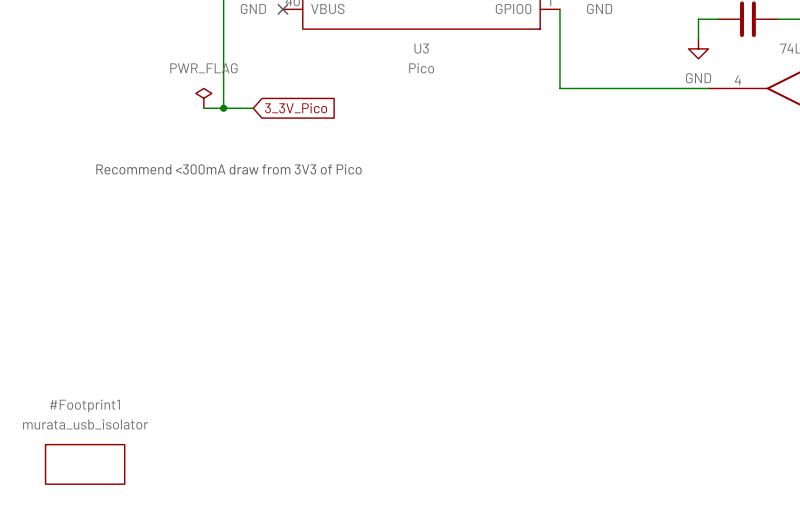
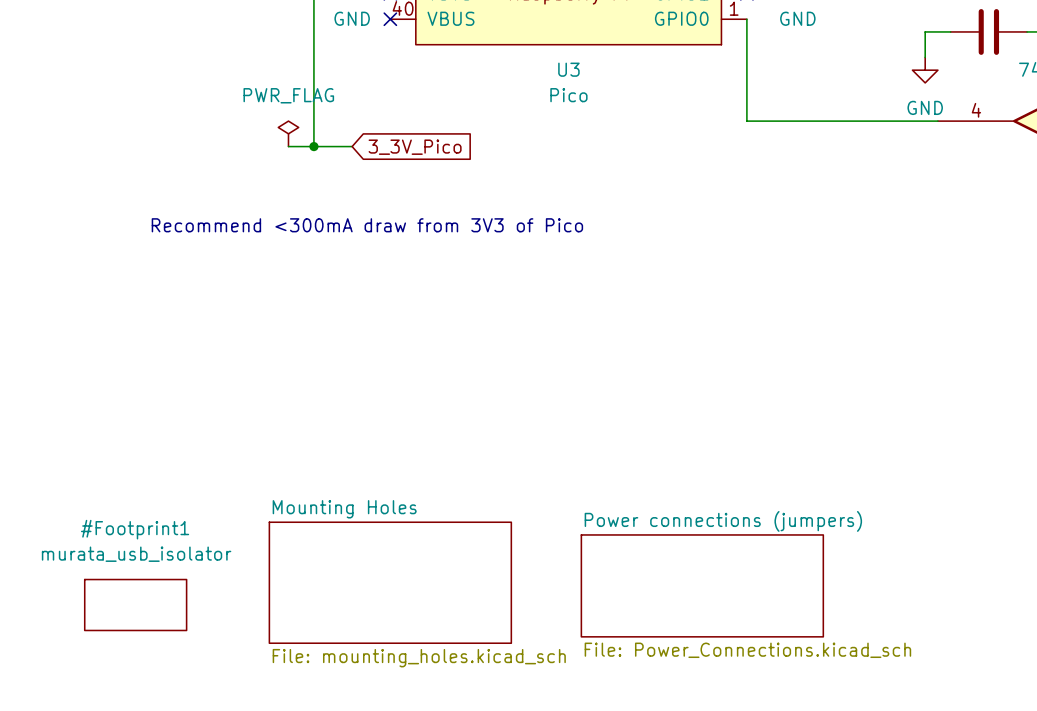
sheet Mounting Holes: none -> File: mounting_holes.kicad_sch (390, 582)
sheet Power connections (jumpers): none -> File: Power_Connections.kicad_sch (702, 585)

